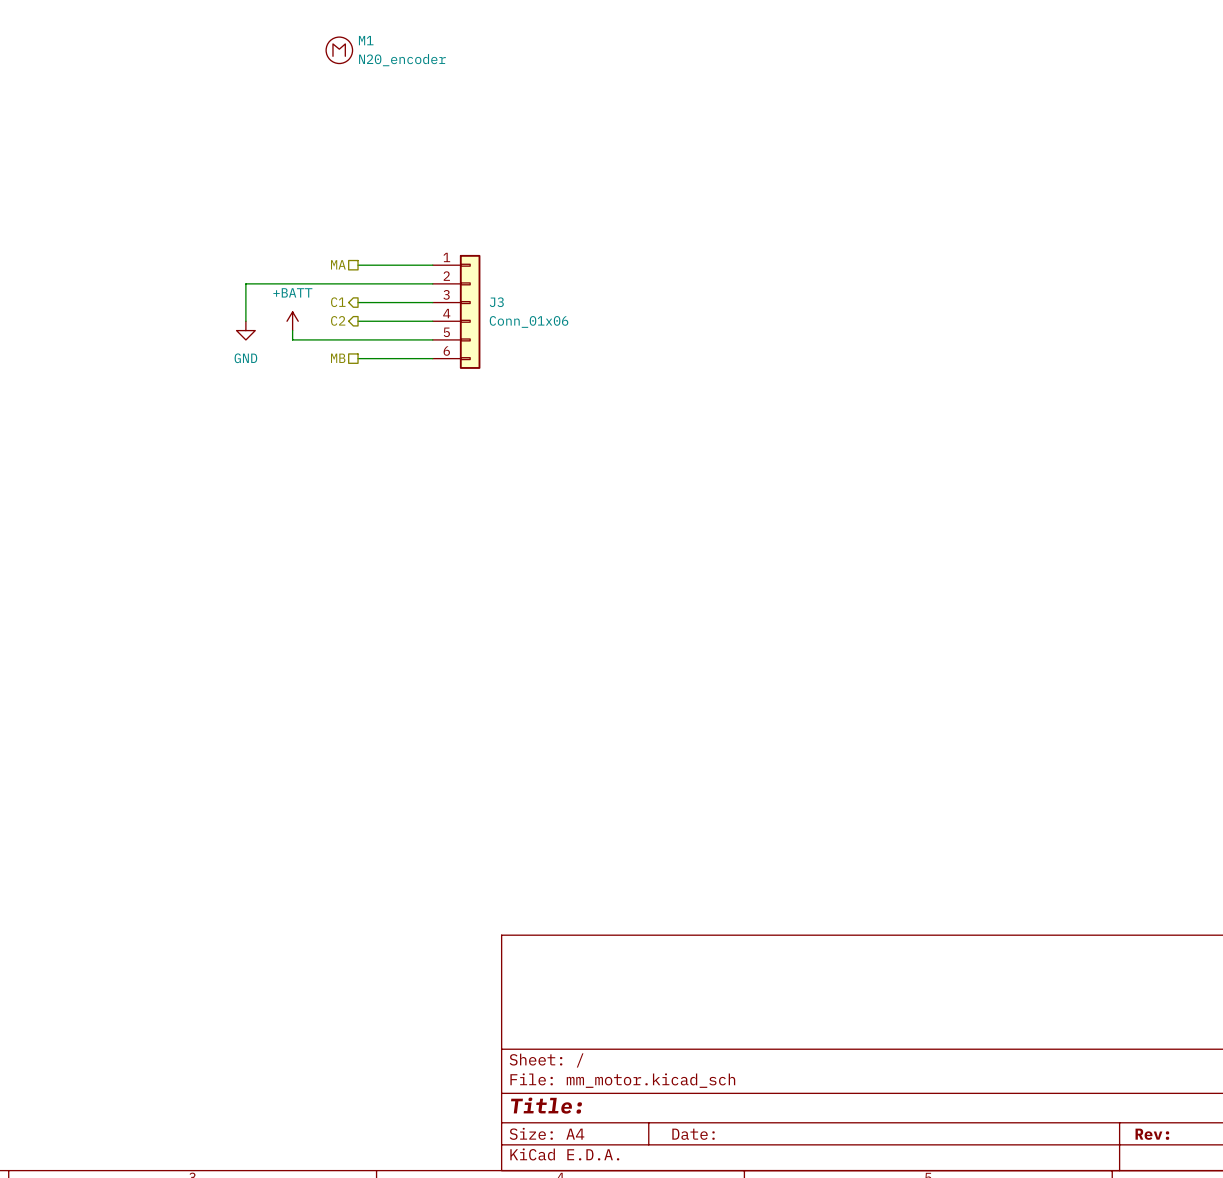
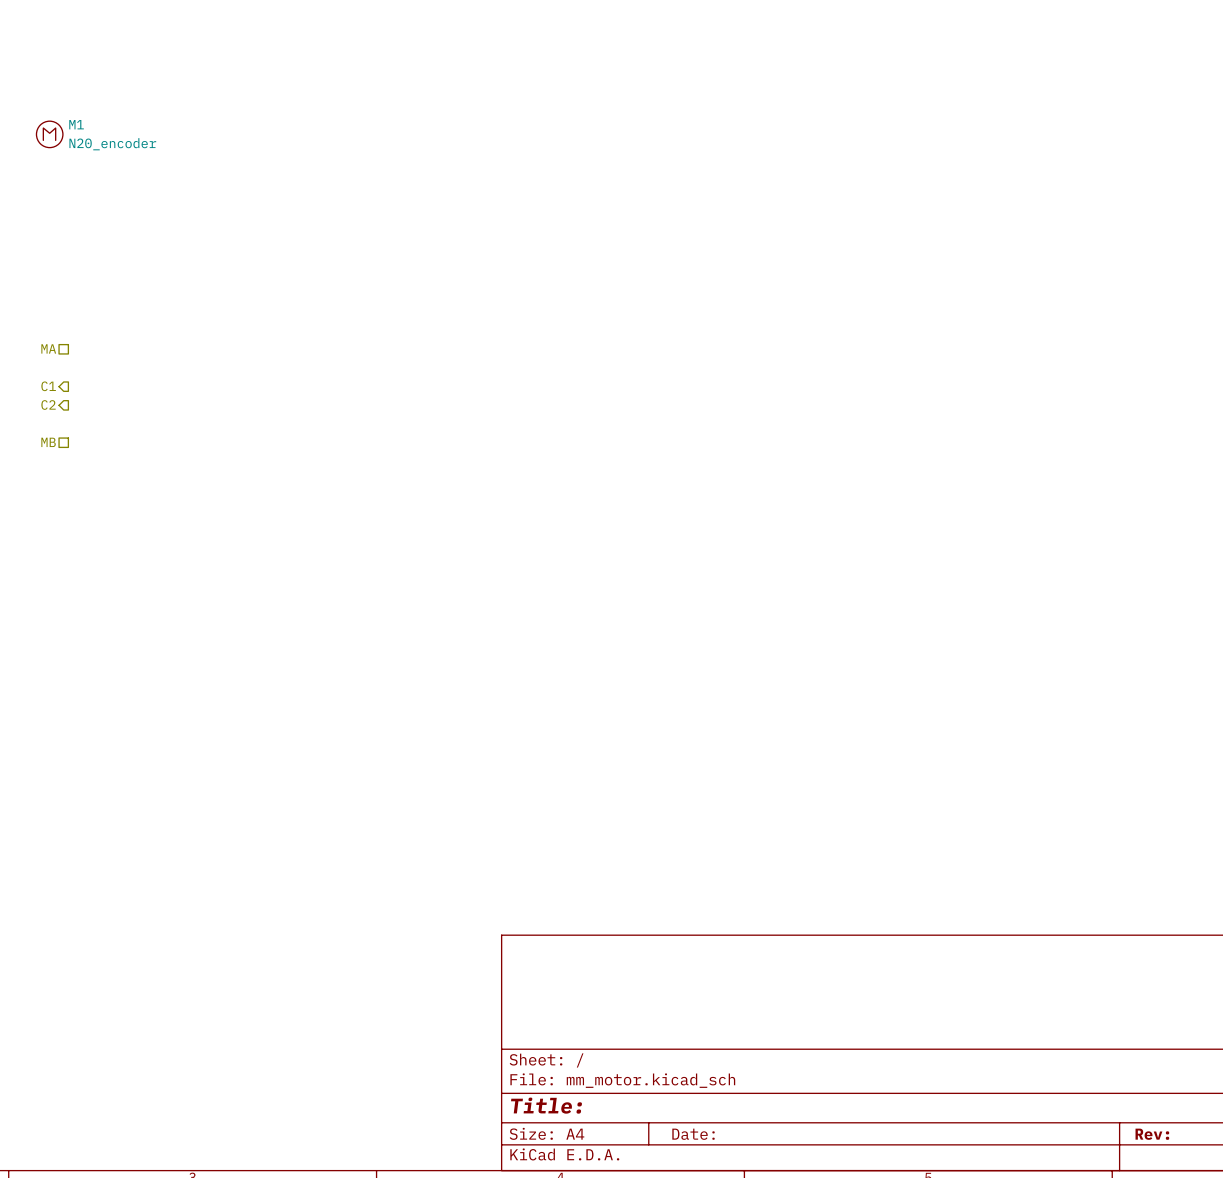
M1 position: (339, 50) -> (49, 134)
hierarchical label: MA (338, 264) -> none
wire: (358, 265) (432, 265) -> none
wire: (432, 283) (245, 283) (245, 321) -> none
hierarchical label: C1 (338, 302) -> none
wire: (358, 302) (432, 302) -> none
J3: Conn_01x06 (456, 311) -> none
hierarchical label: C2 (338, 320) -> none
power symbol: +BATT (292, 321) -> none
wire: (358, 321) (432, 321) -> none
power symbol: GND (245, 330) -> none
wire: (292, 330) (292, 339) (432, 339) -> none
hierarchical label: none -> MA (48, 348)
hierarchical label: MB (338, 358) -> none
wire: (358, 358) (432, 358) -> none
hierarchical label: none -> C1 (48, 386)
hierarchical label: none -> C2 (48, 404)
hierarchical label: none -> MB (48, 442)

